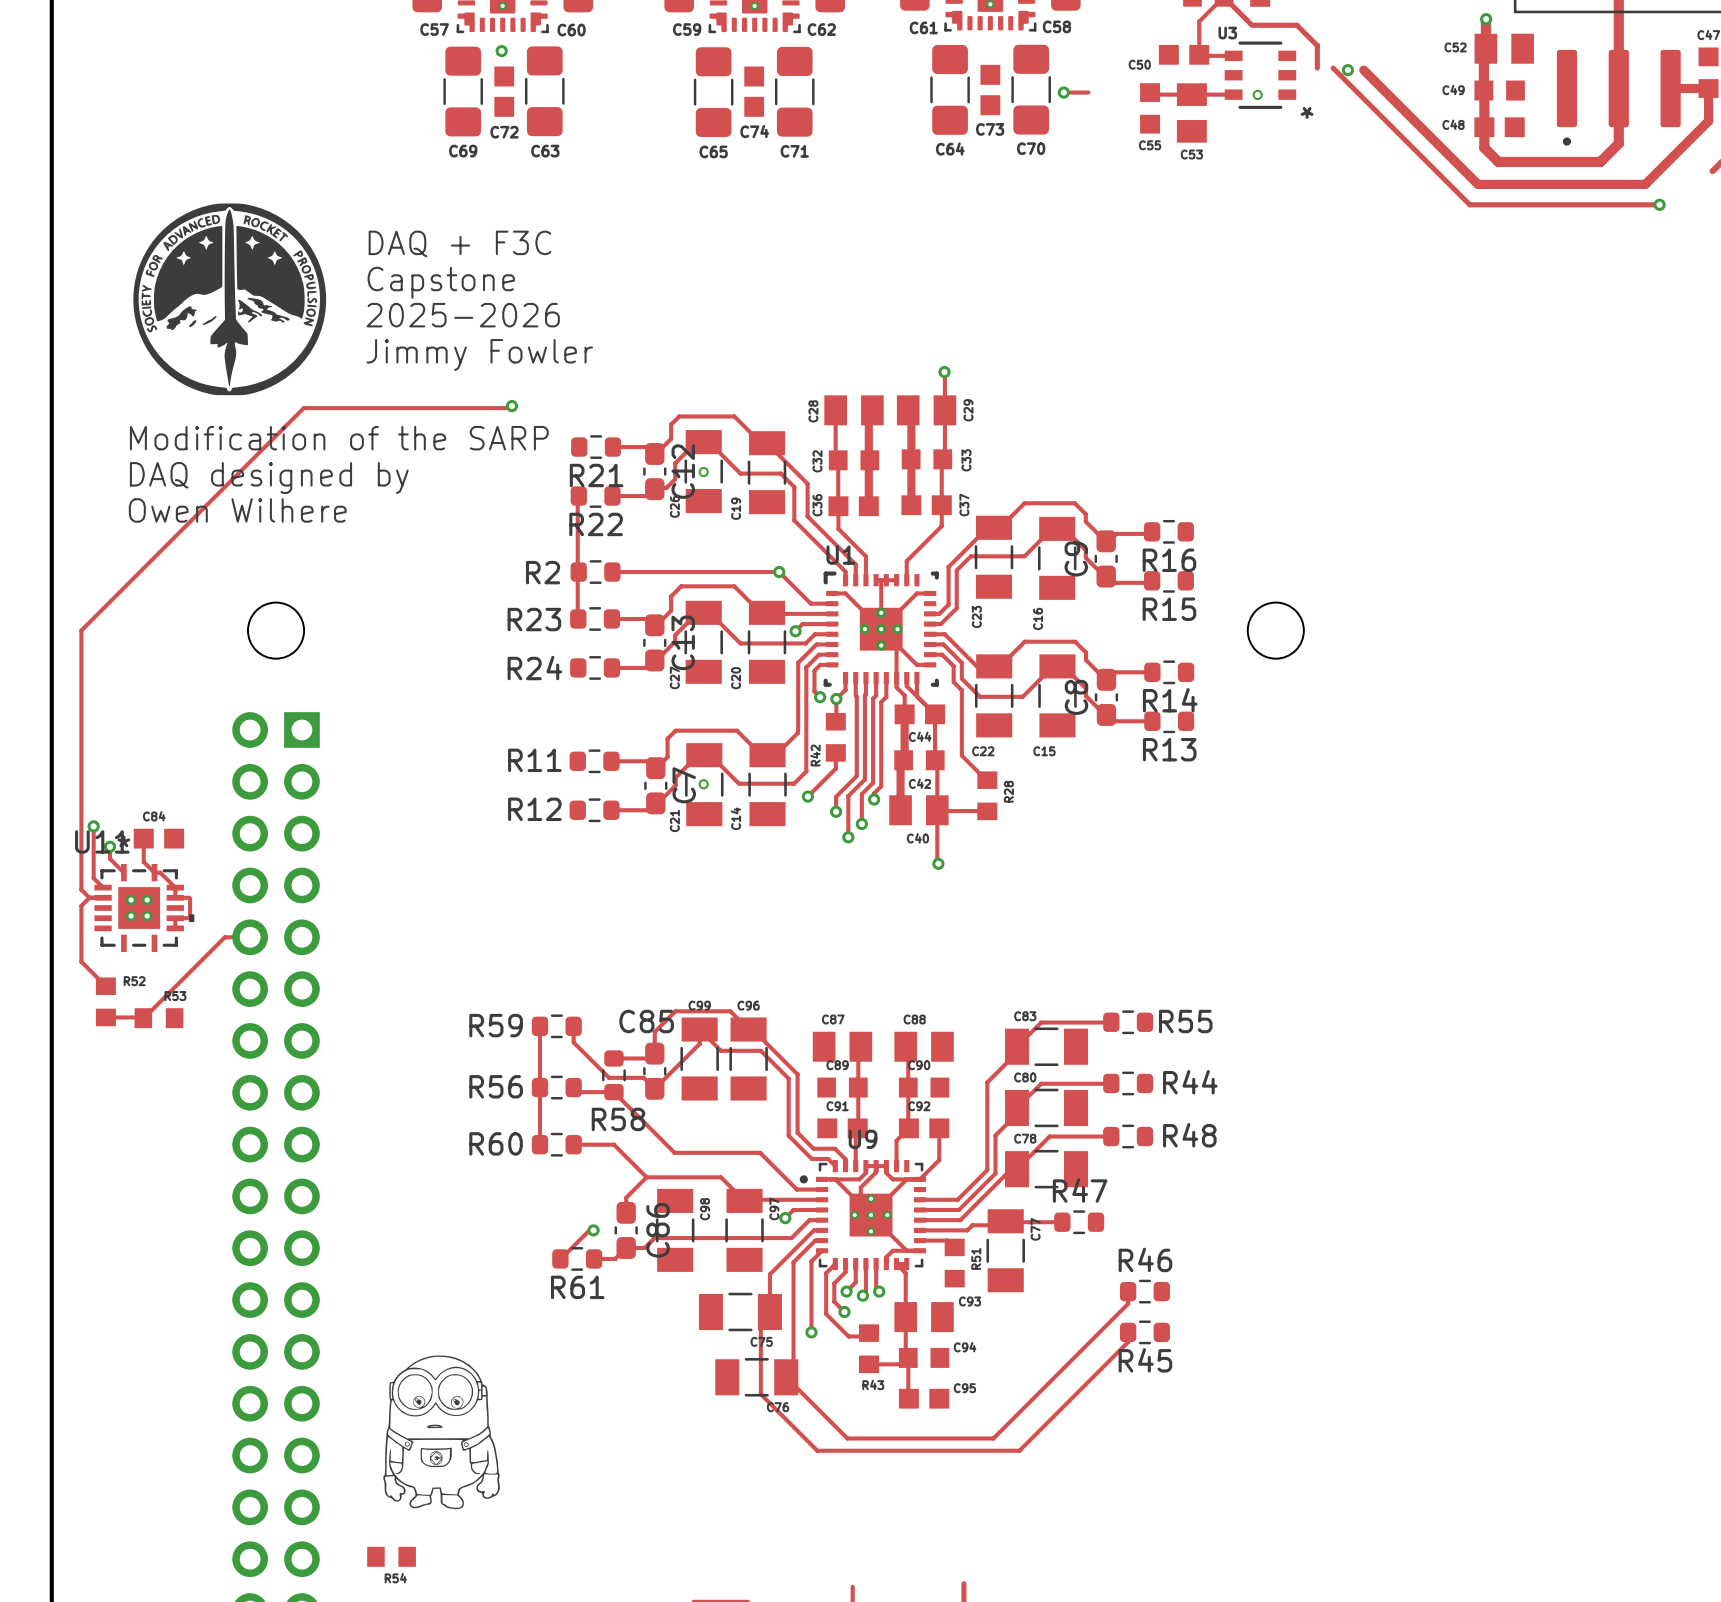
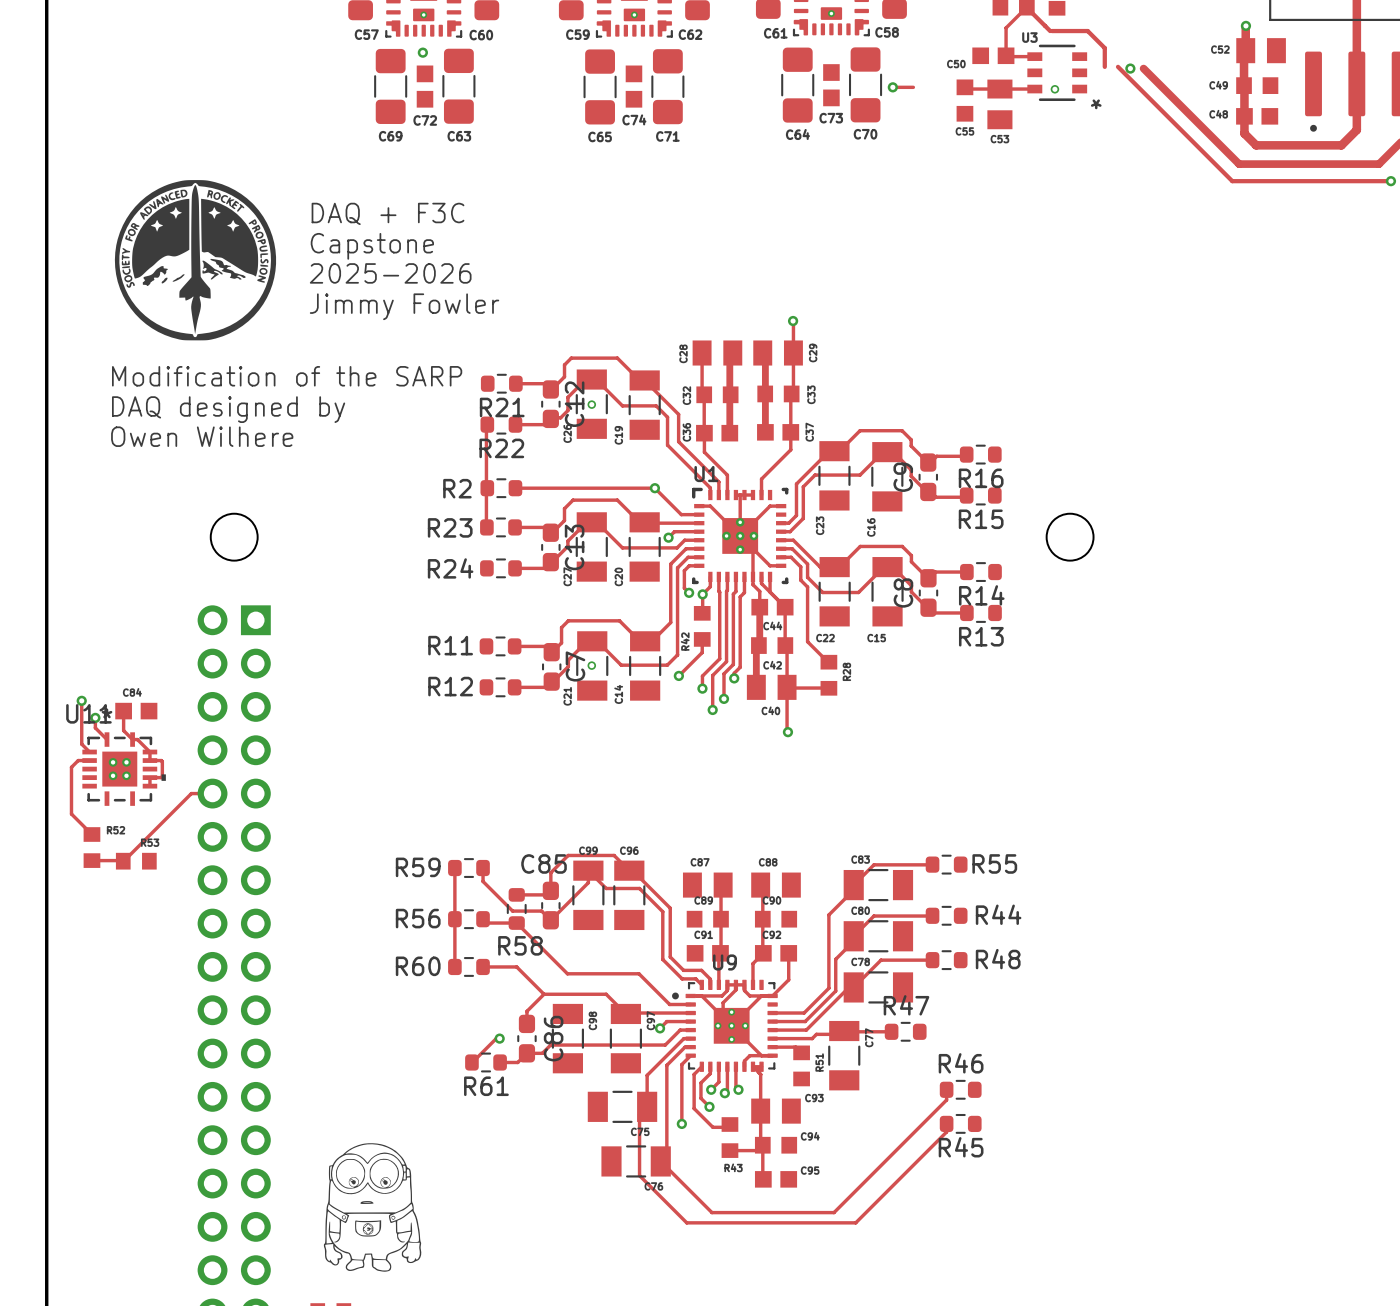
track: (511, 406) (509, 408) (303, 408) (81, 630) (81, 889) (89, 897) -> none
via: (511, 406) -> none

